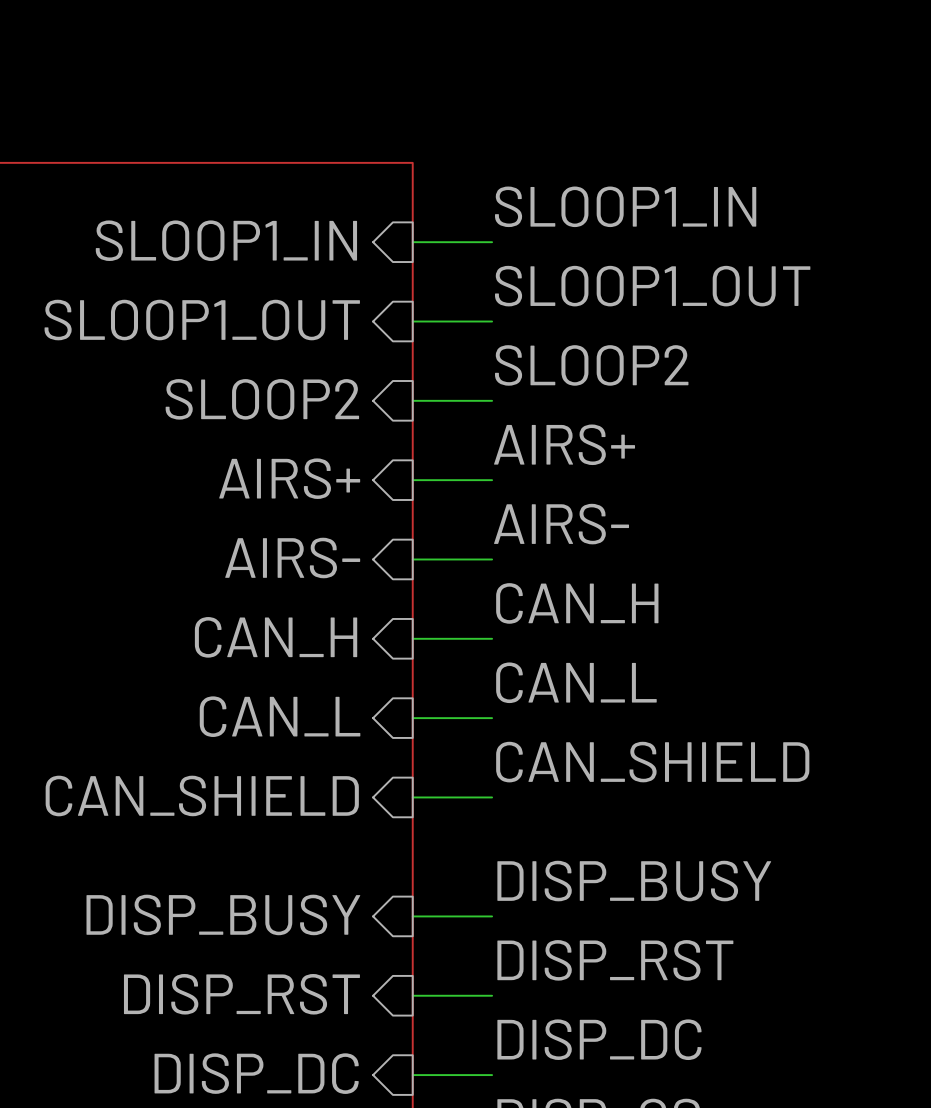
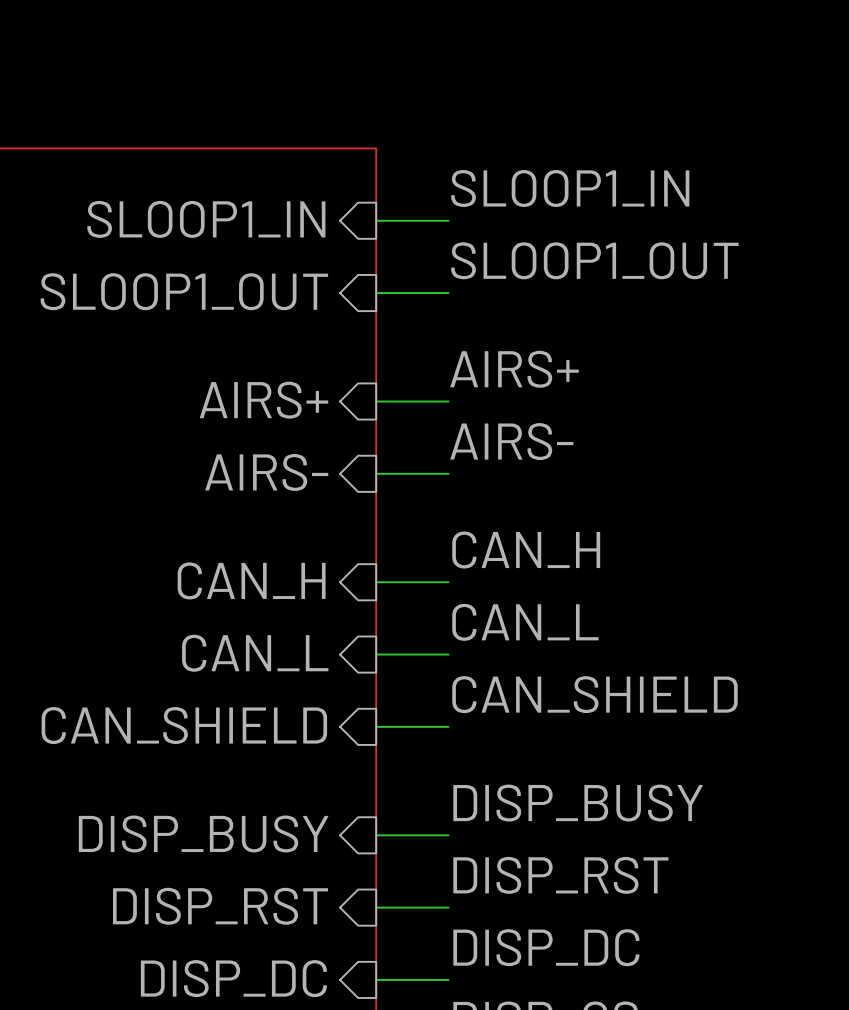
label: SLOOP2 (591, 365) -> none
sheet pin: SLOOP2 (262, 399) -> none
wire: (412, 400) (492, 400) -> (376, 401) (448, 401)
label position: AIRS+ (564, 444) -> AIRS+ (514, 369)
sheet pin position: AIRS+ (289, 478) -> AIRS+ (263, 400)
wire: (412, 480) (492, 480) -> (376, 473) (448, 473)
label position: AIRS- (561, 524) -> AIRS- (511, 441)
sheet pin position: AIRS- (292, 558) -> AIRS- (266, 472)
wire: (412, 559) (492, 559) -> none

